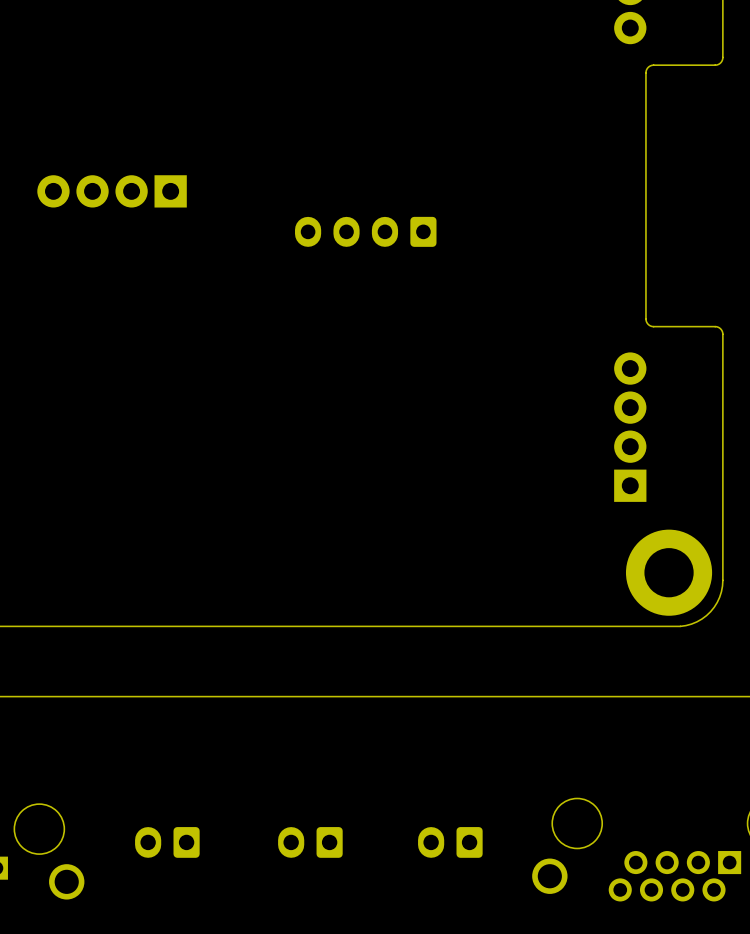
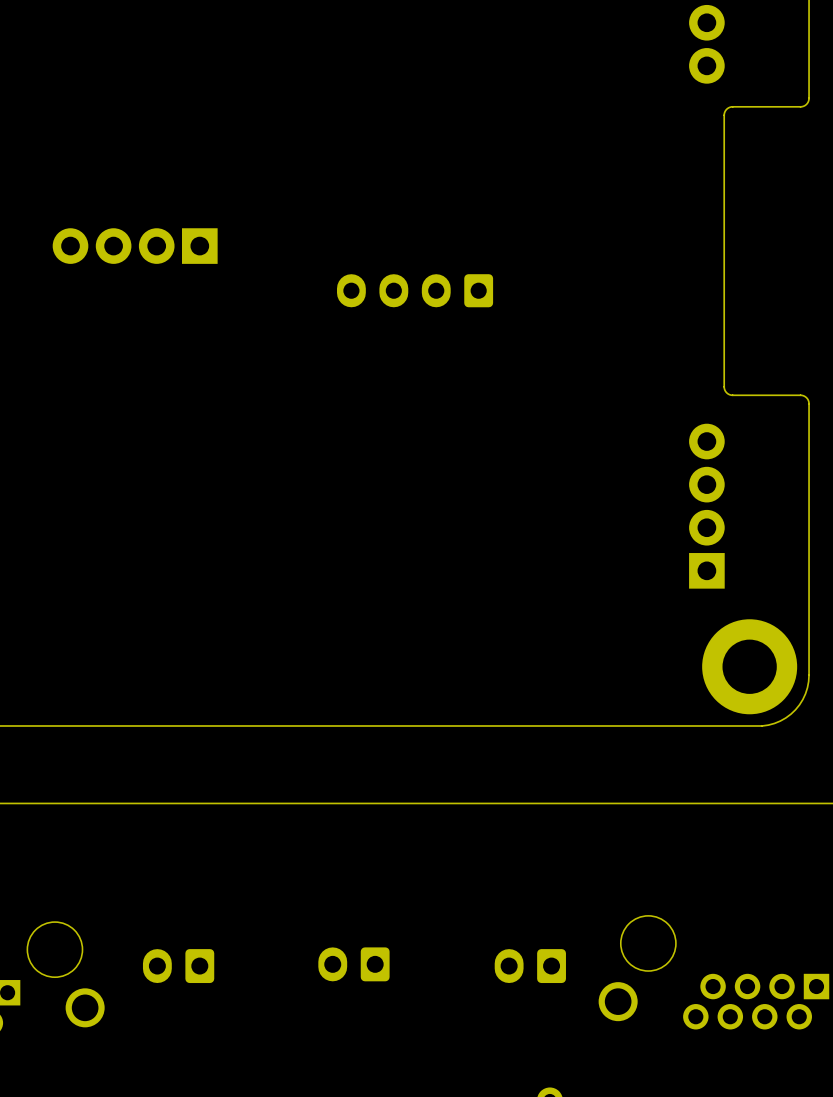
part: (167, 842) -> none
part: (450, 842) -> none
part: none -> (178, 966)
part: none -> (530, 966)

